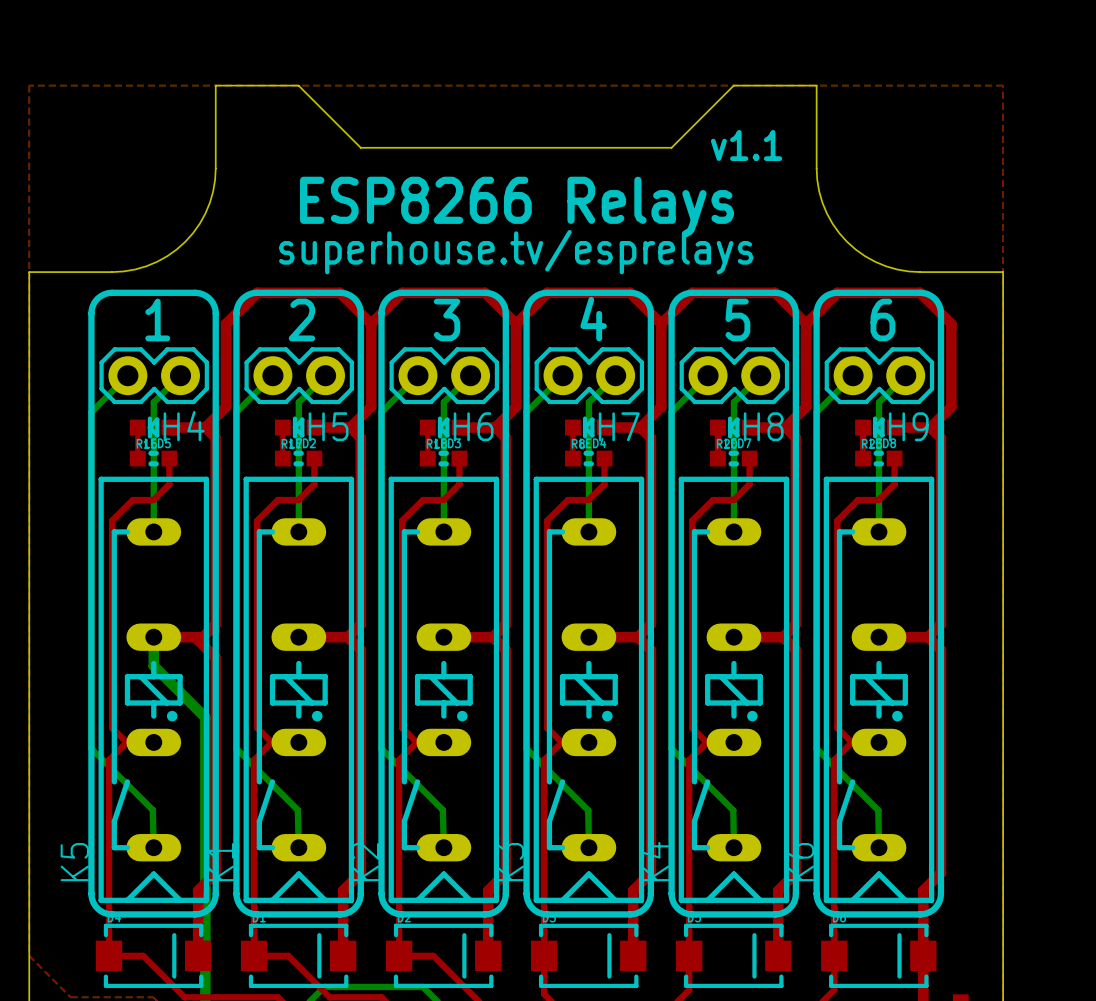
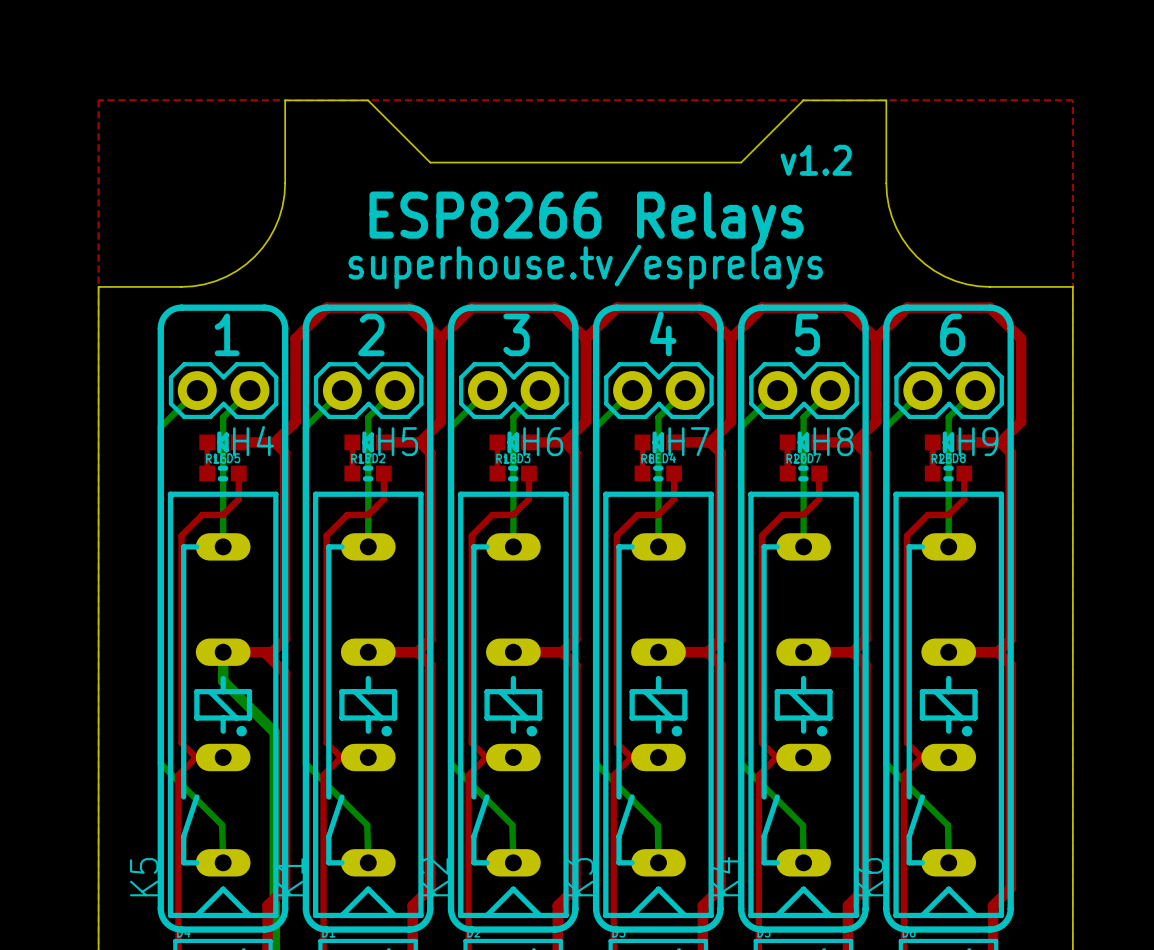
text: v1.1 (746, 145) -> v1.2 (816, 160)

